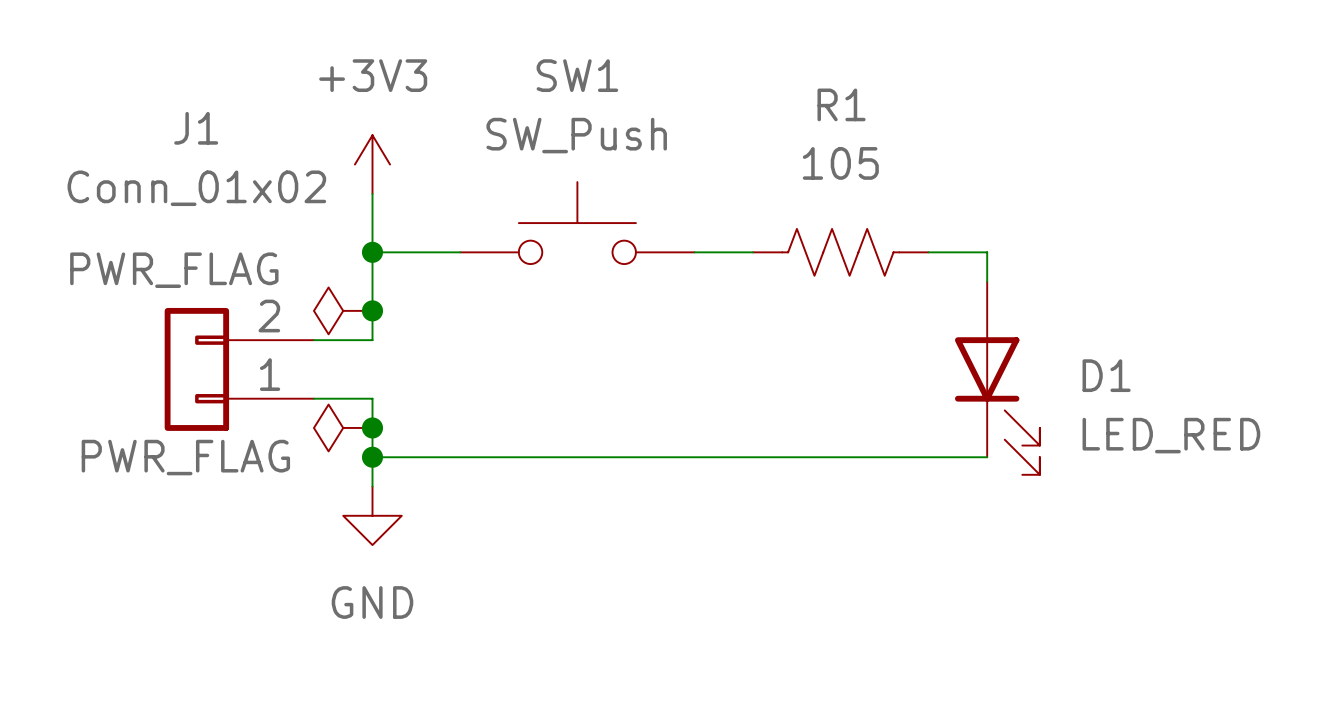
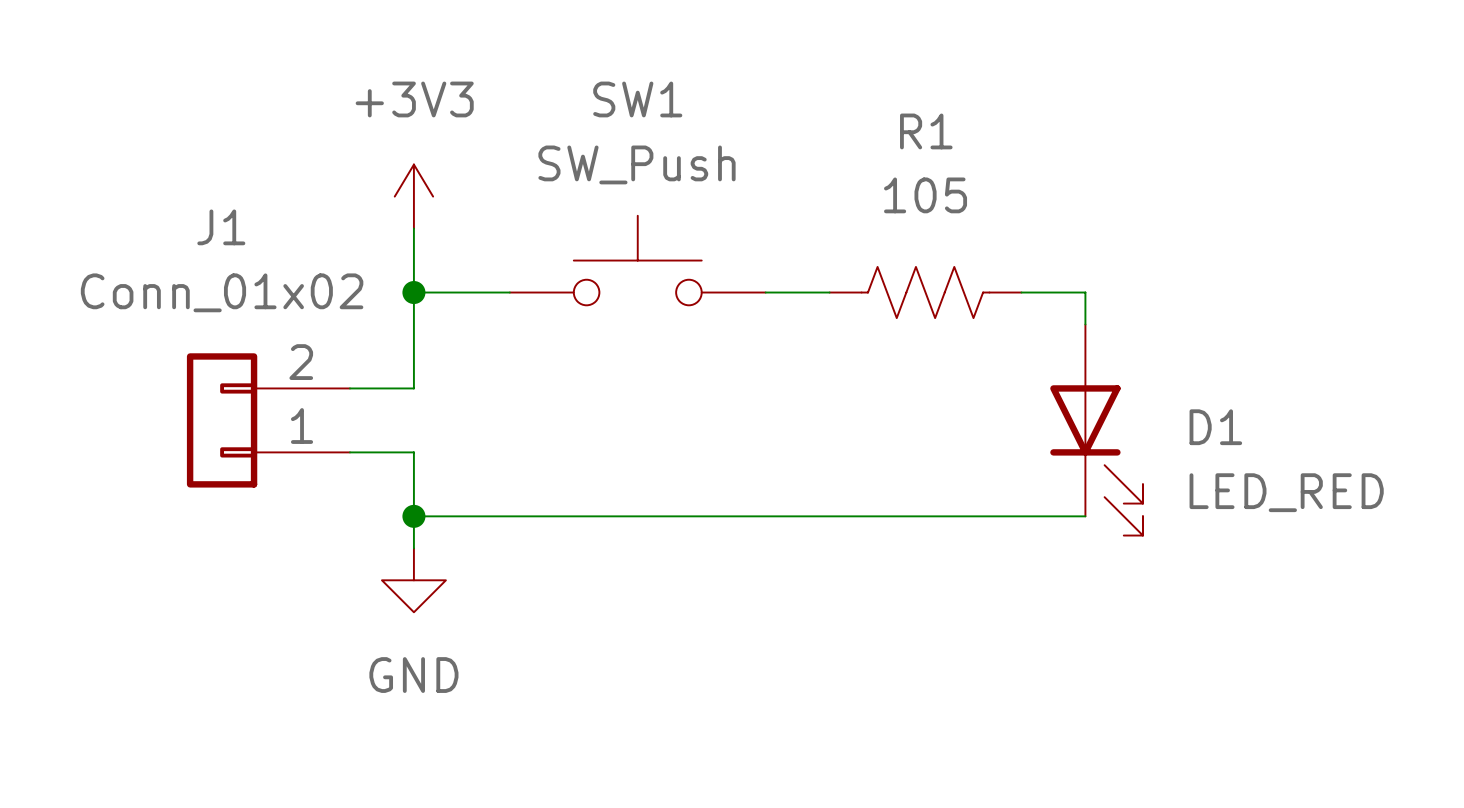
J1 name position: J1 (196, 128) -> J1 (221, 227)
J1 value position: Conn_01x02 (196, 188) -> Conn_01x02 (222, 292)
power symbol: PWR_FLAG (343, 310) -> none
junction: (372, 310) -> none
power symbol: PWR_FLAG (343, 427) -> none
junction: (372, 427) -> none

